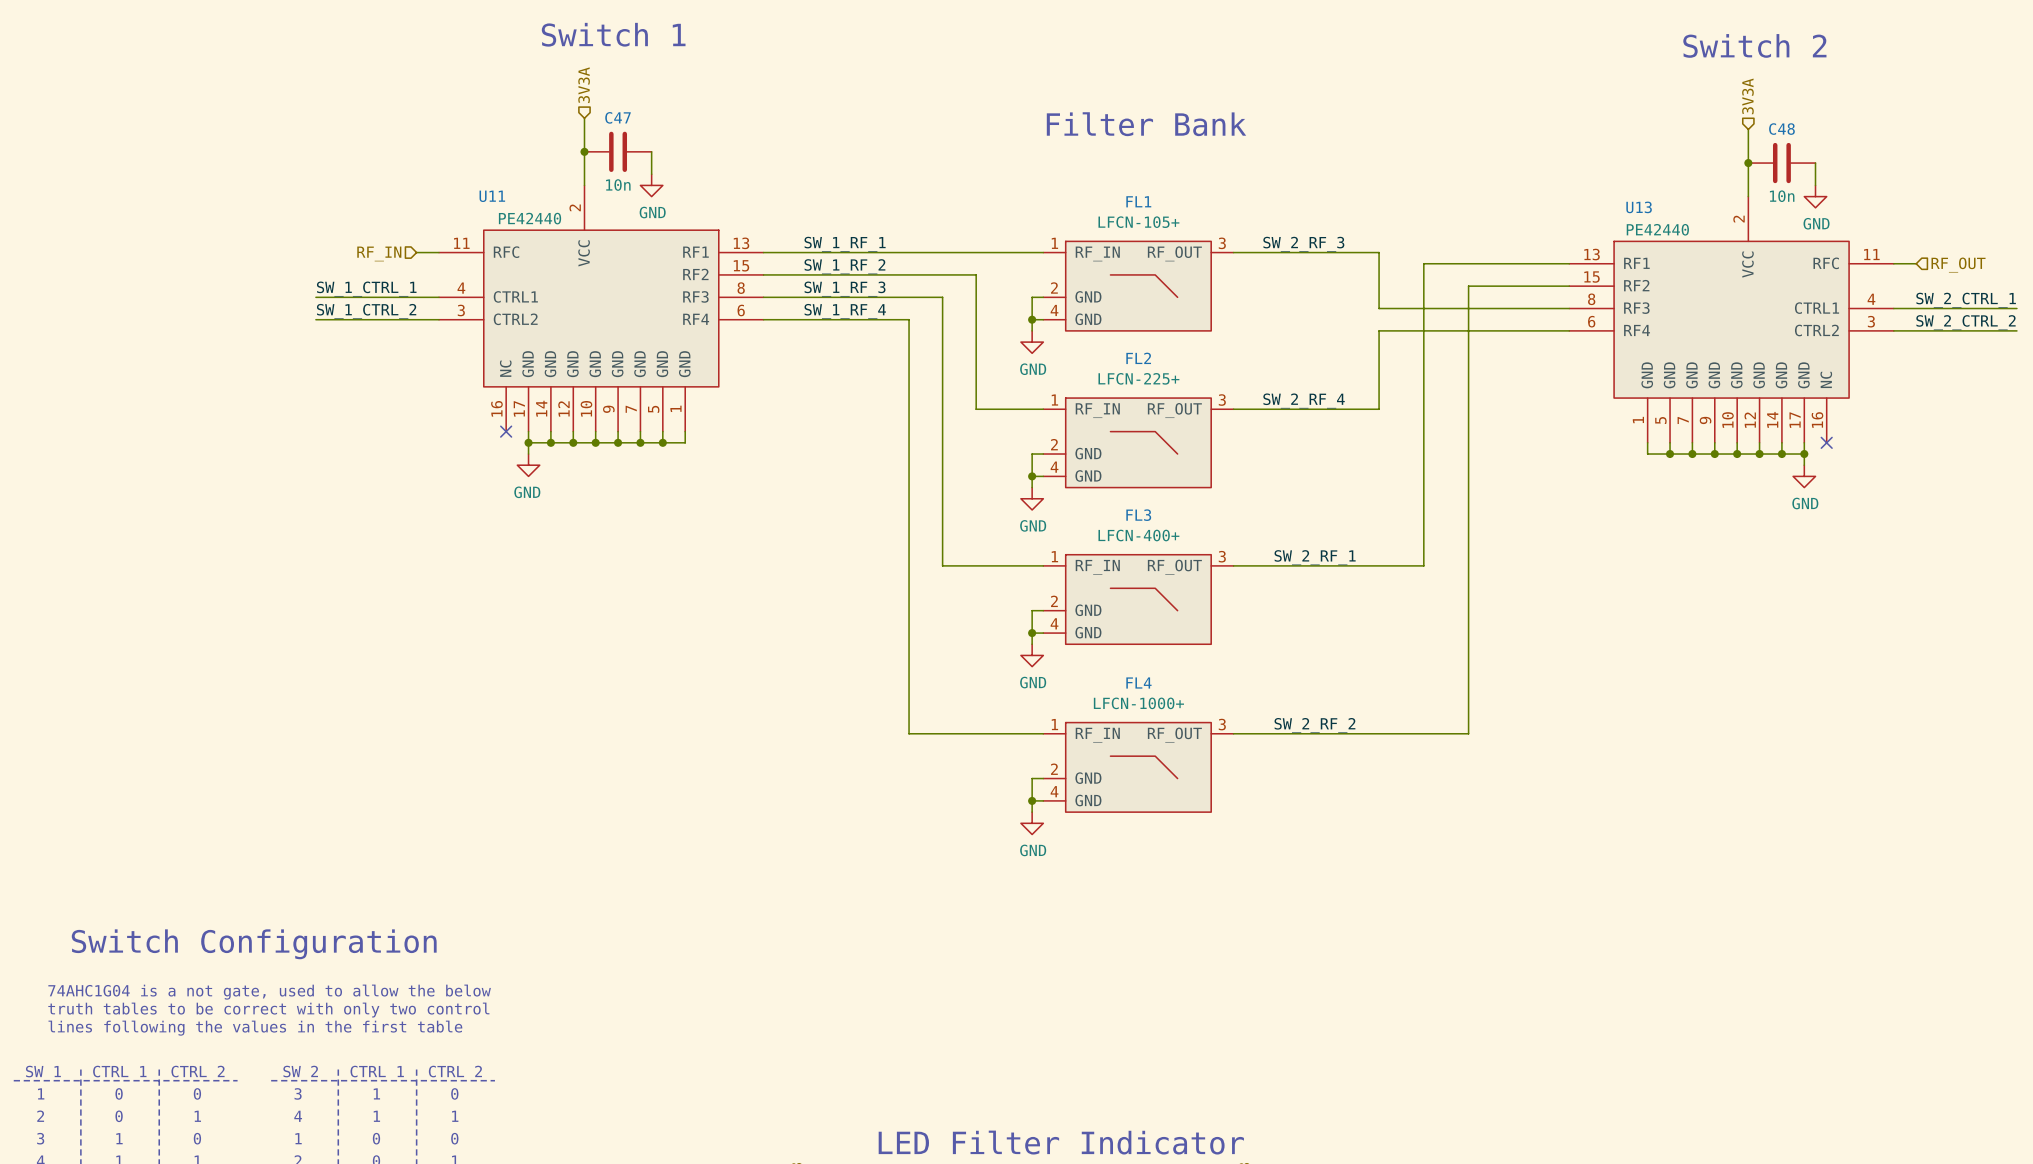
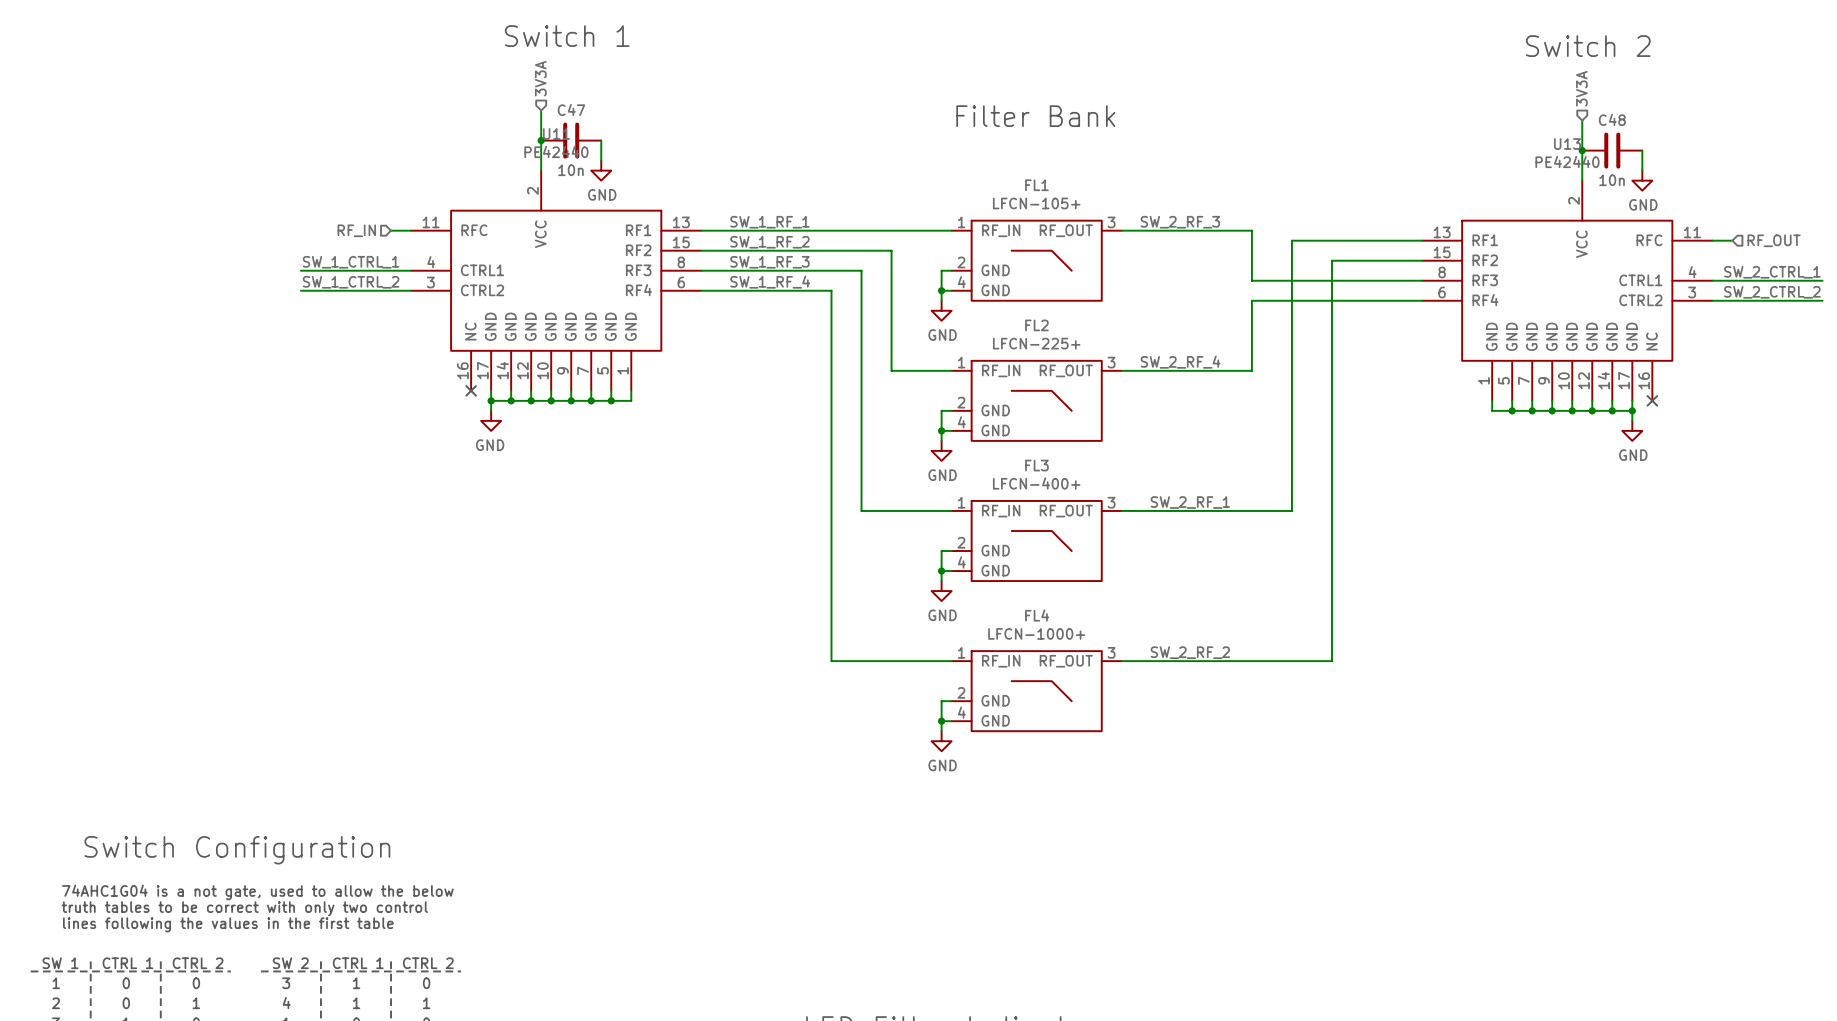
U11 name position: U11 (492, 196) -> U11 (556, 134)
U13 name position: U13 (1639, 207) -> U13 (1567, 144)
U11 value position: PE42440 (530, 218) -> PE42440 (556, 151)
U13 value position: PE42440 (1657, 229) -> PE42440 (1567, 162)

